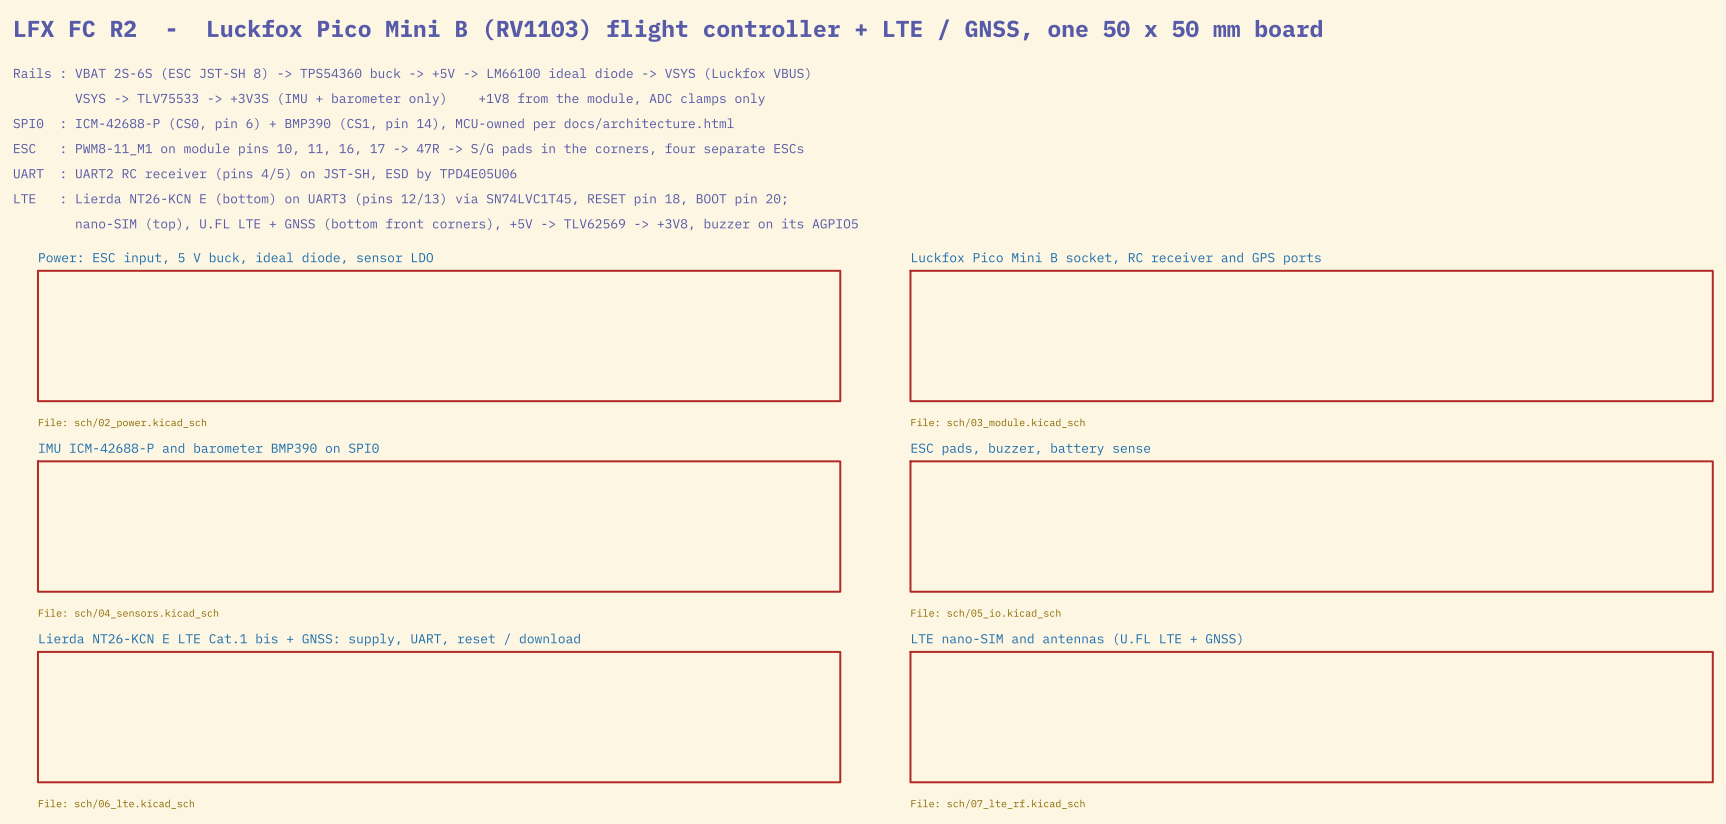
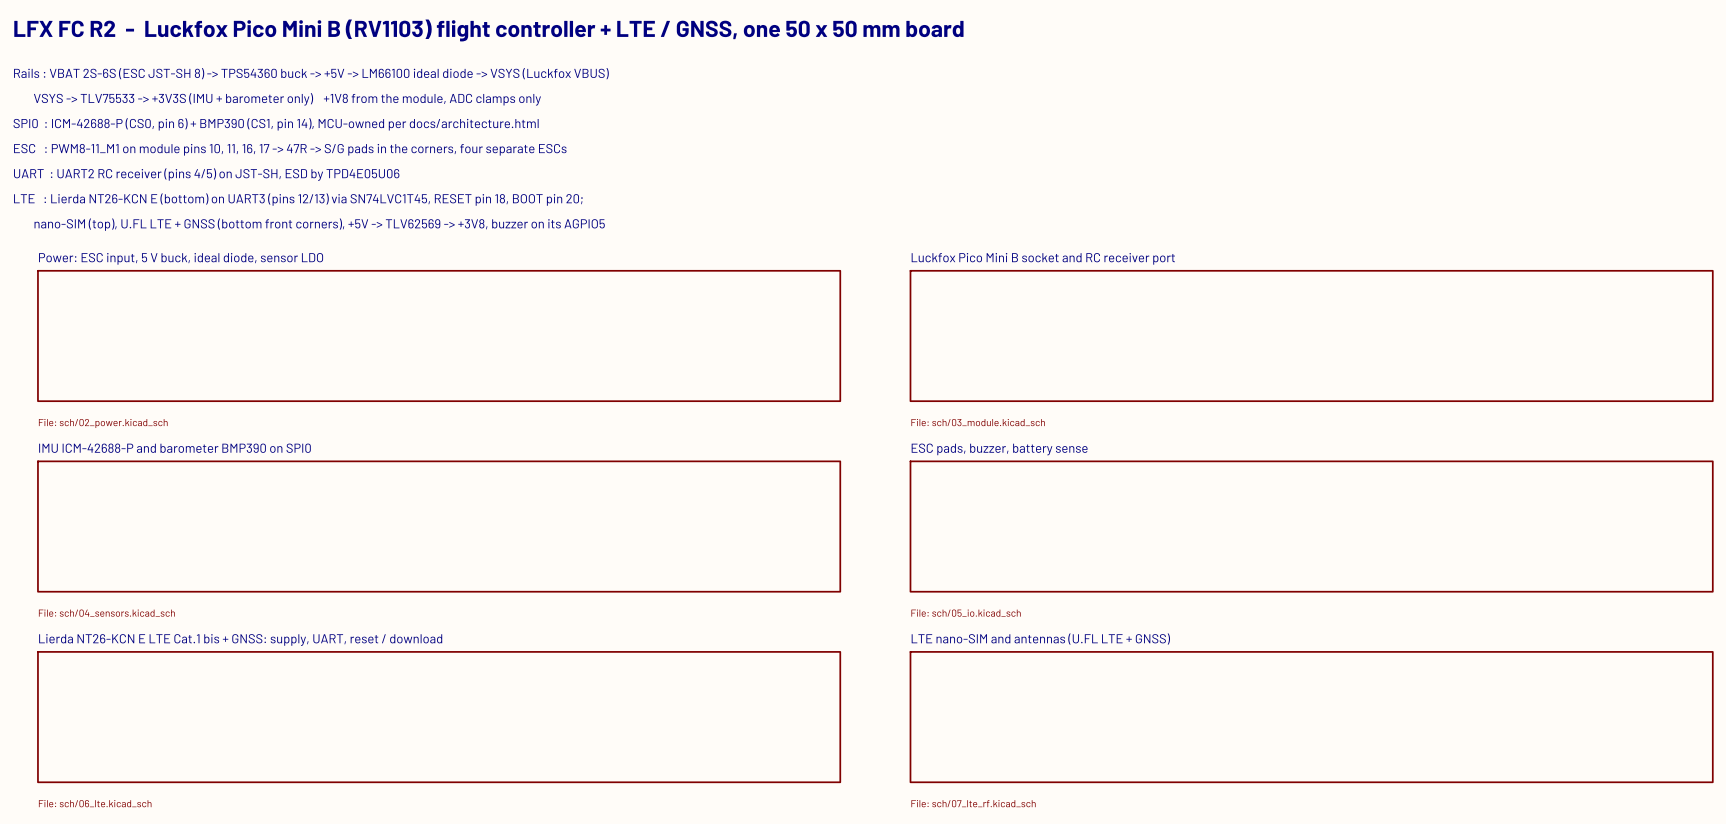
sheet Luckfox Pico Mini B socket, RC receiver and GPS ports name: Luckfox Pico Mini B socket, RC receiver and GPS ports (1116, 258) -> Luckfox Pico Mini B socket and RC receiver port (1043, 258)

